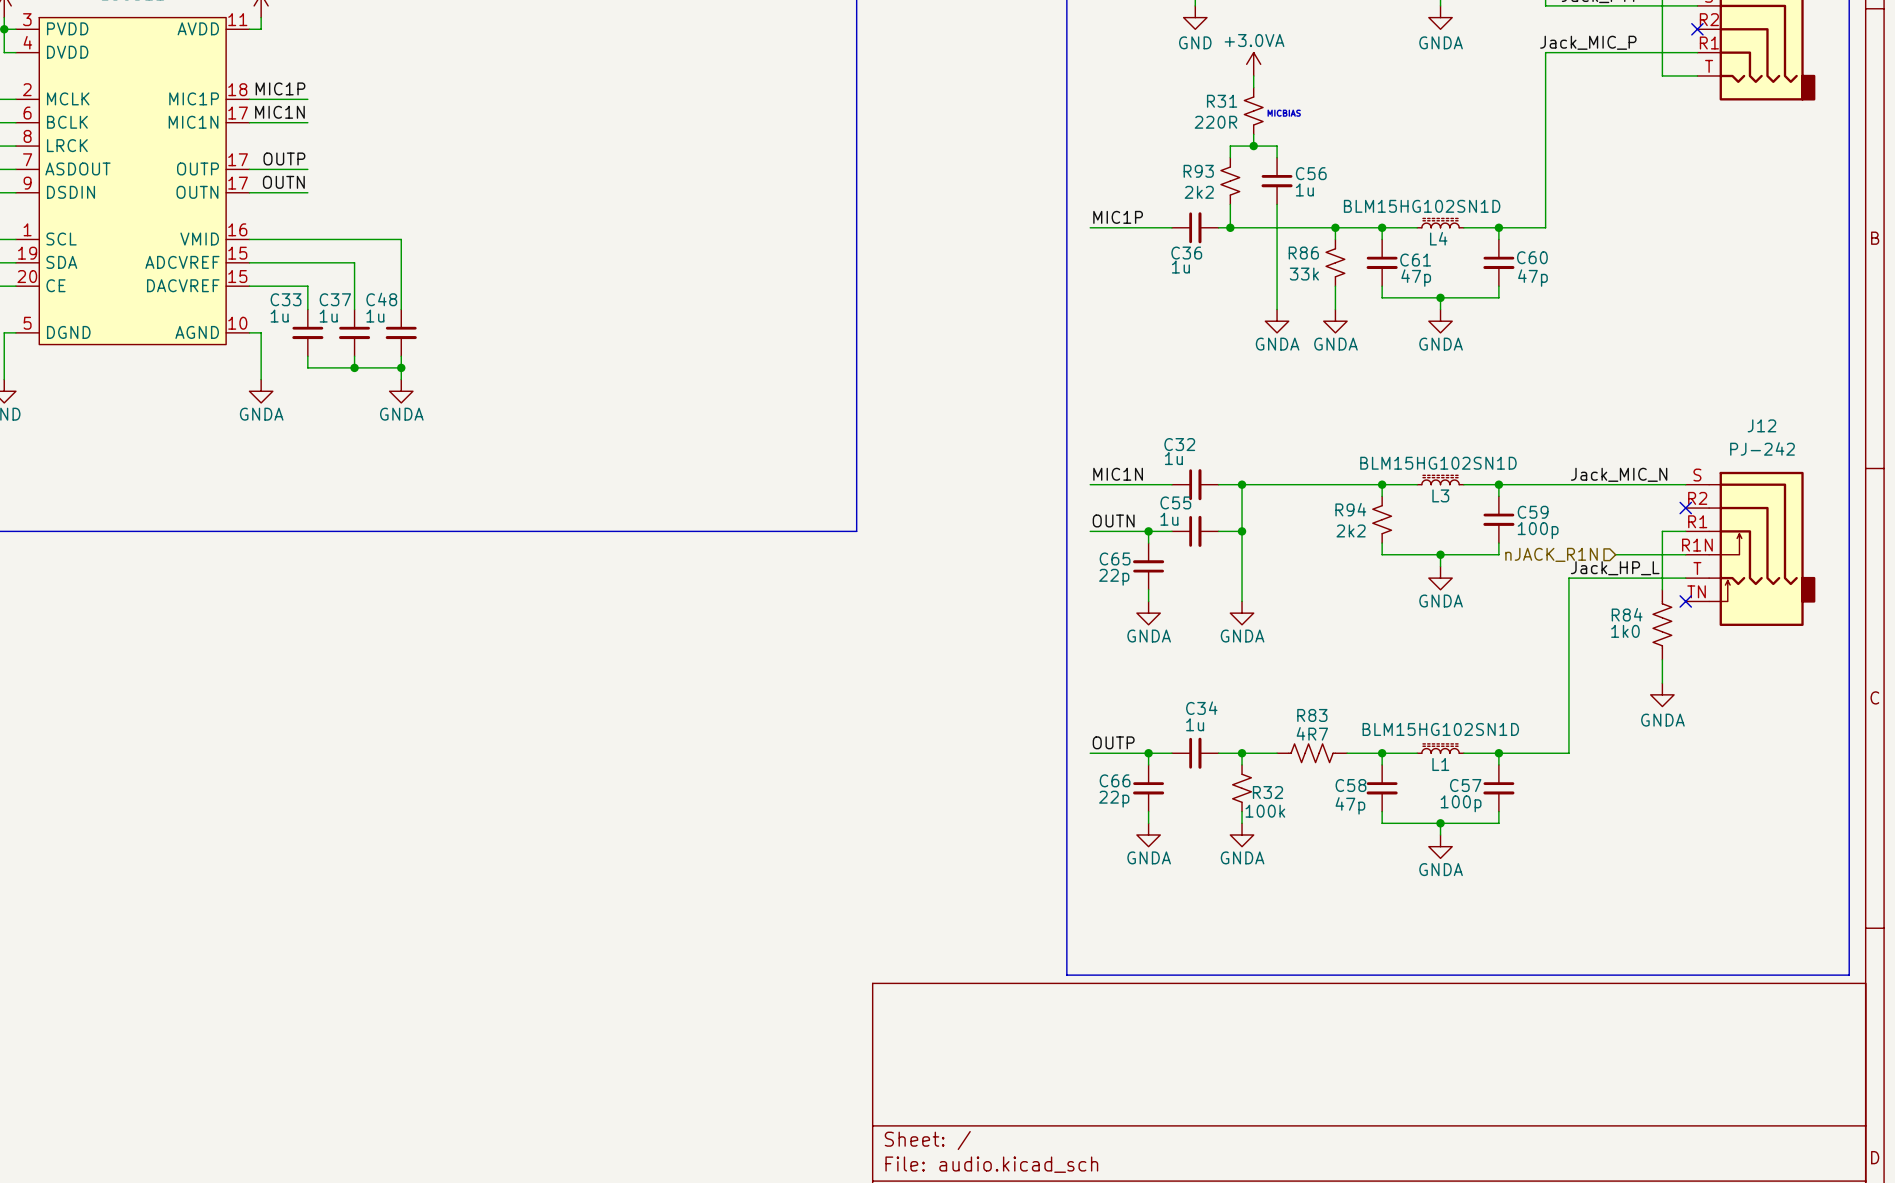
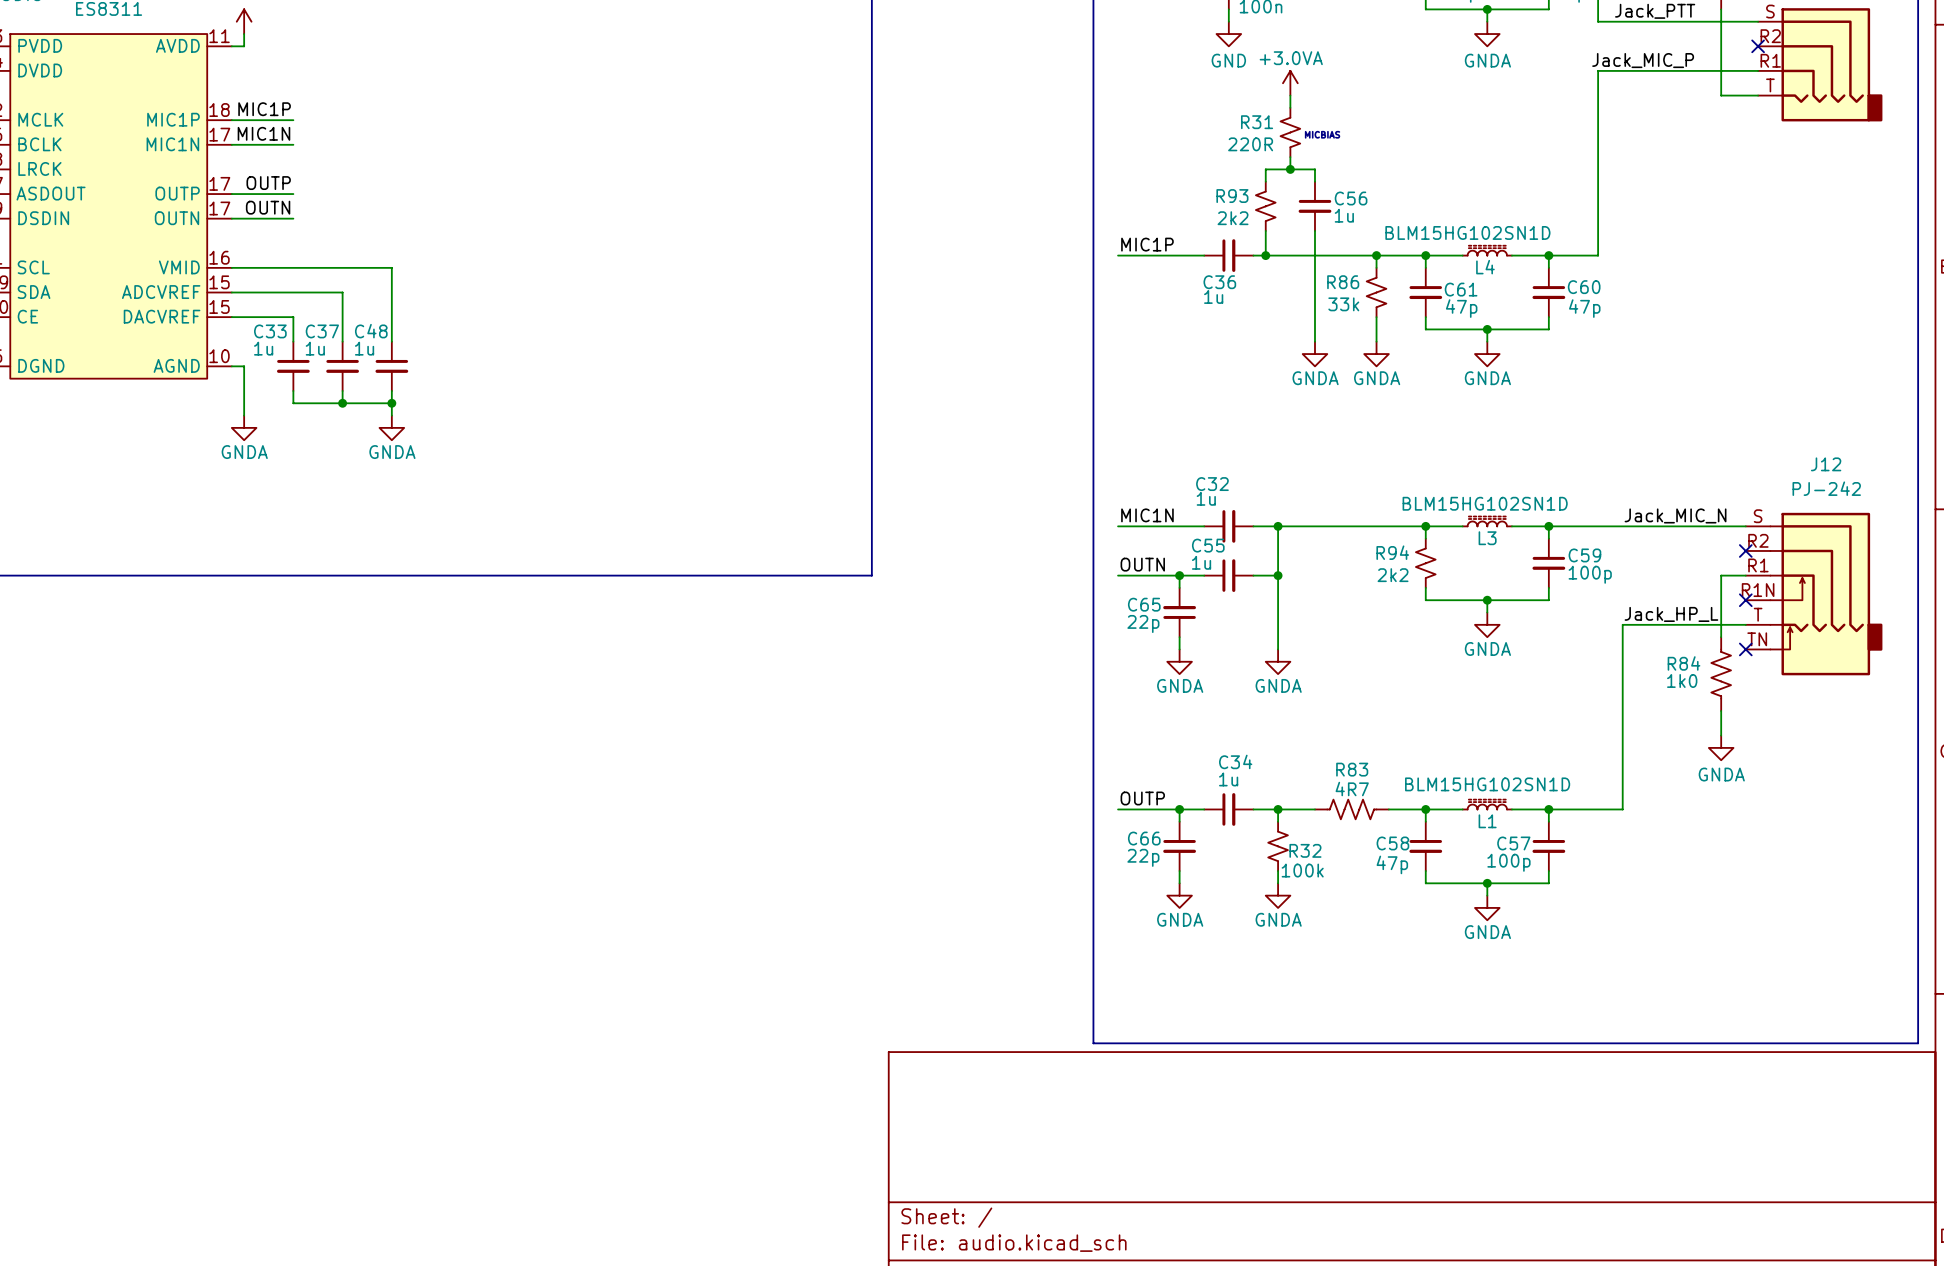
hierarchical label: nJACK_R1N (1551, 554) -> none
wire: (1615, 554) (1685, 554) -> none
no-connect mark: none -> (1745, 600)

